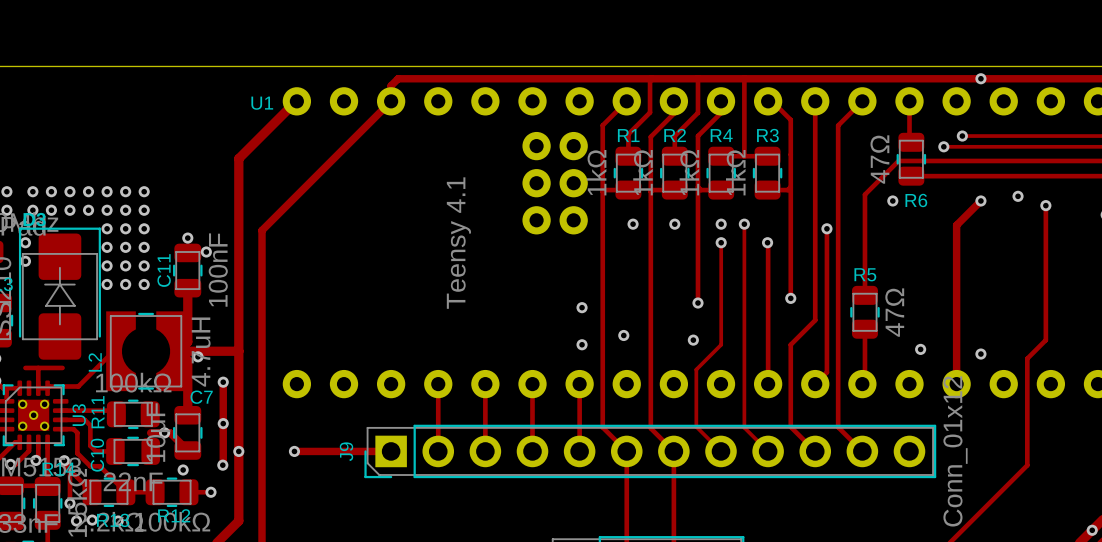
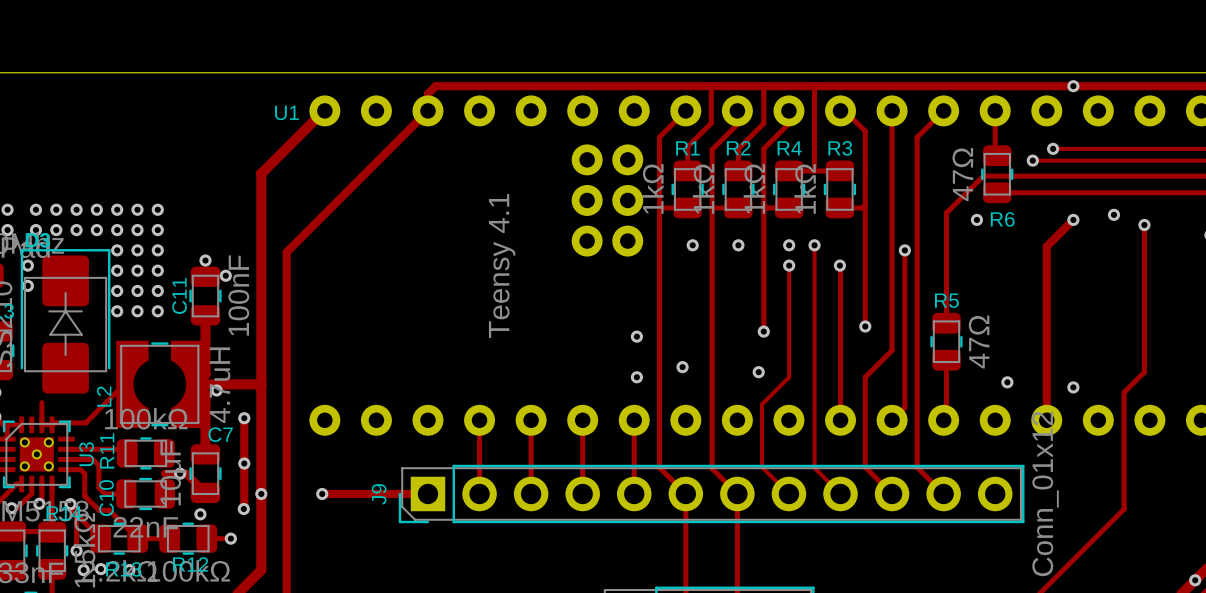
track: (25, 367) (62, 367) -> none

